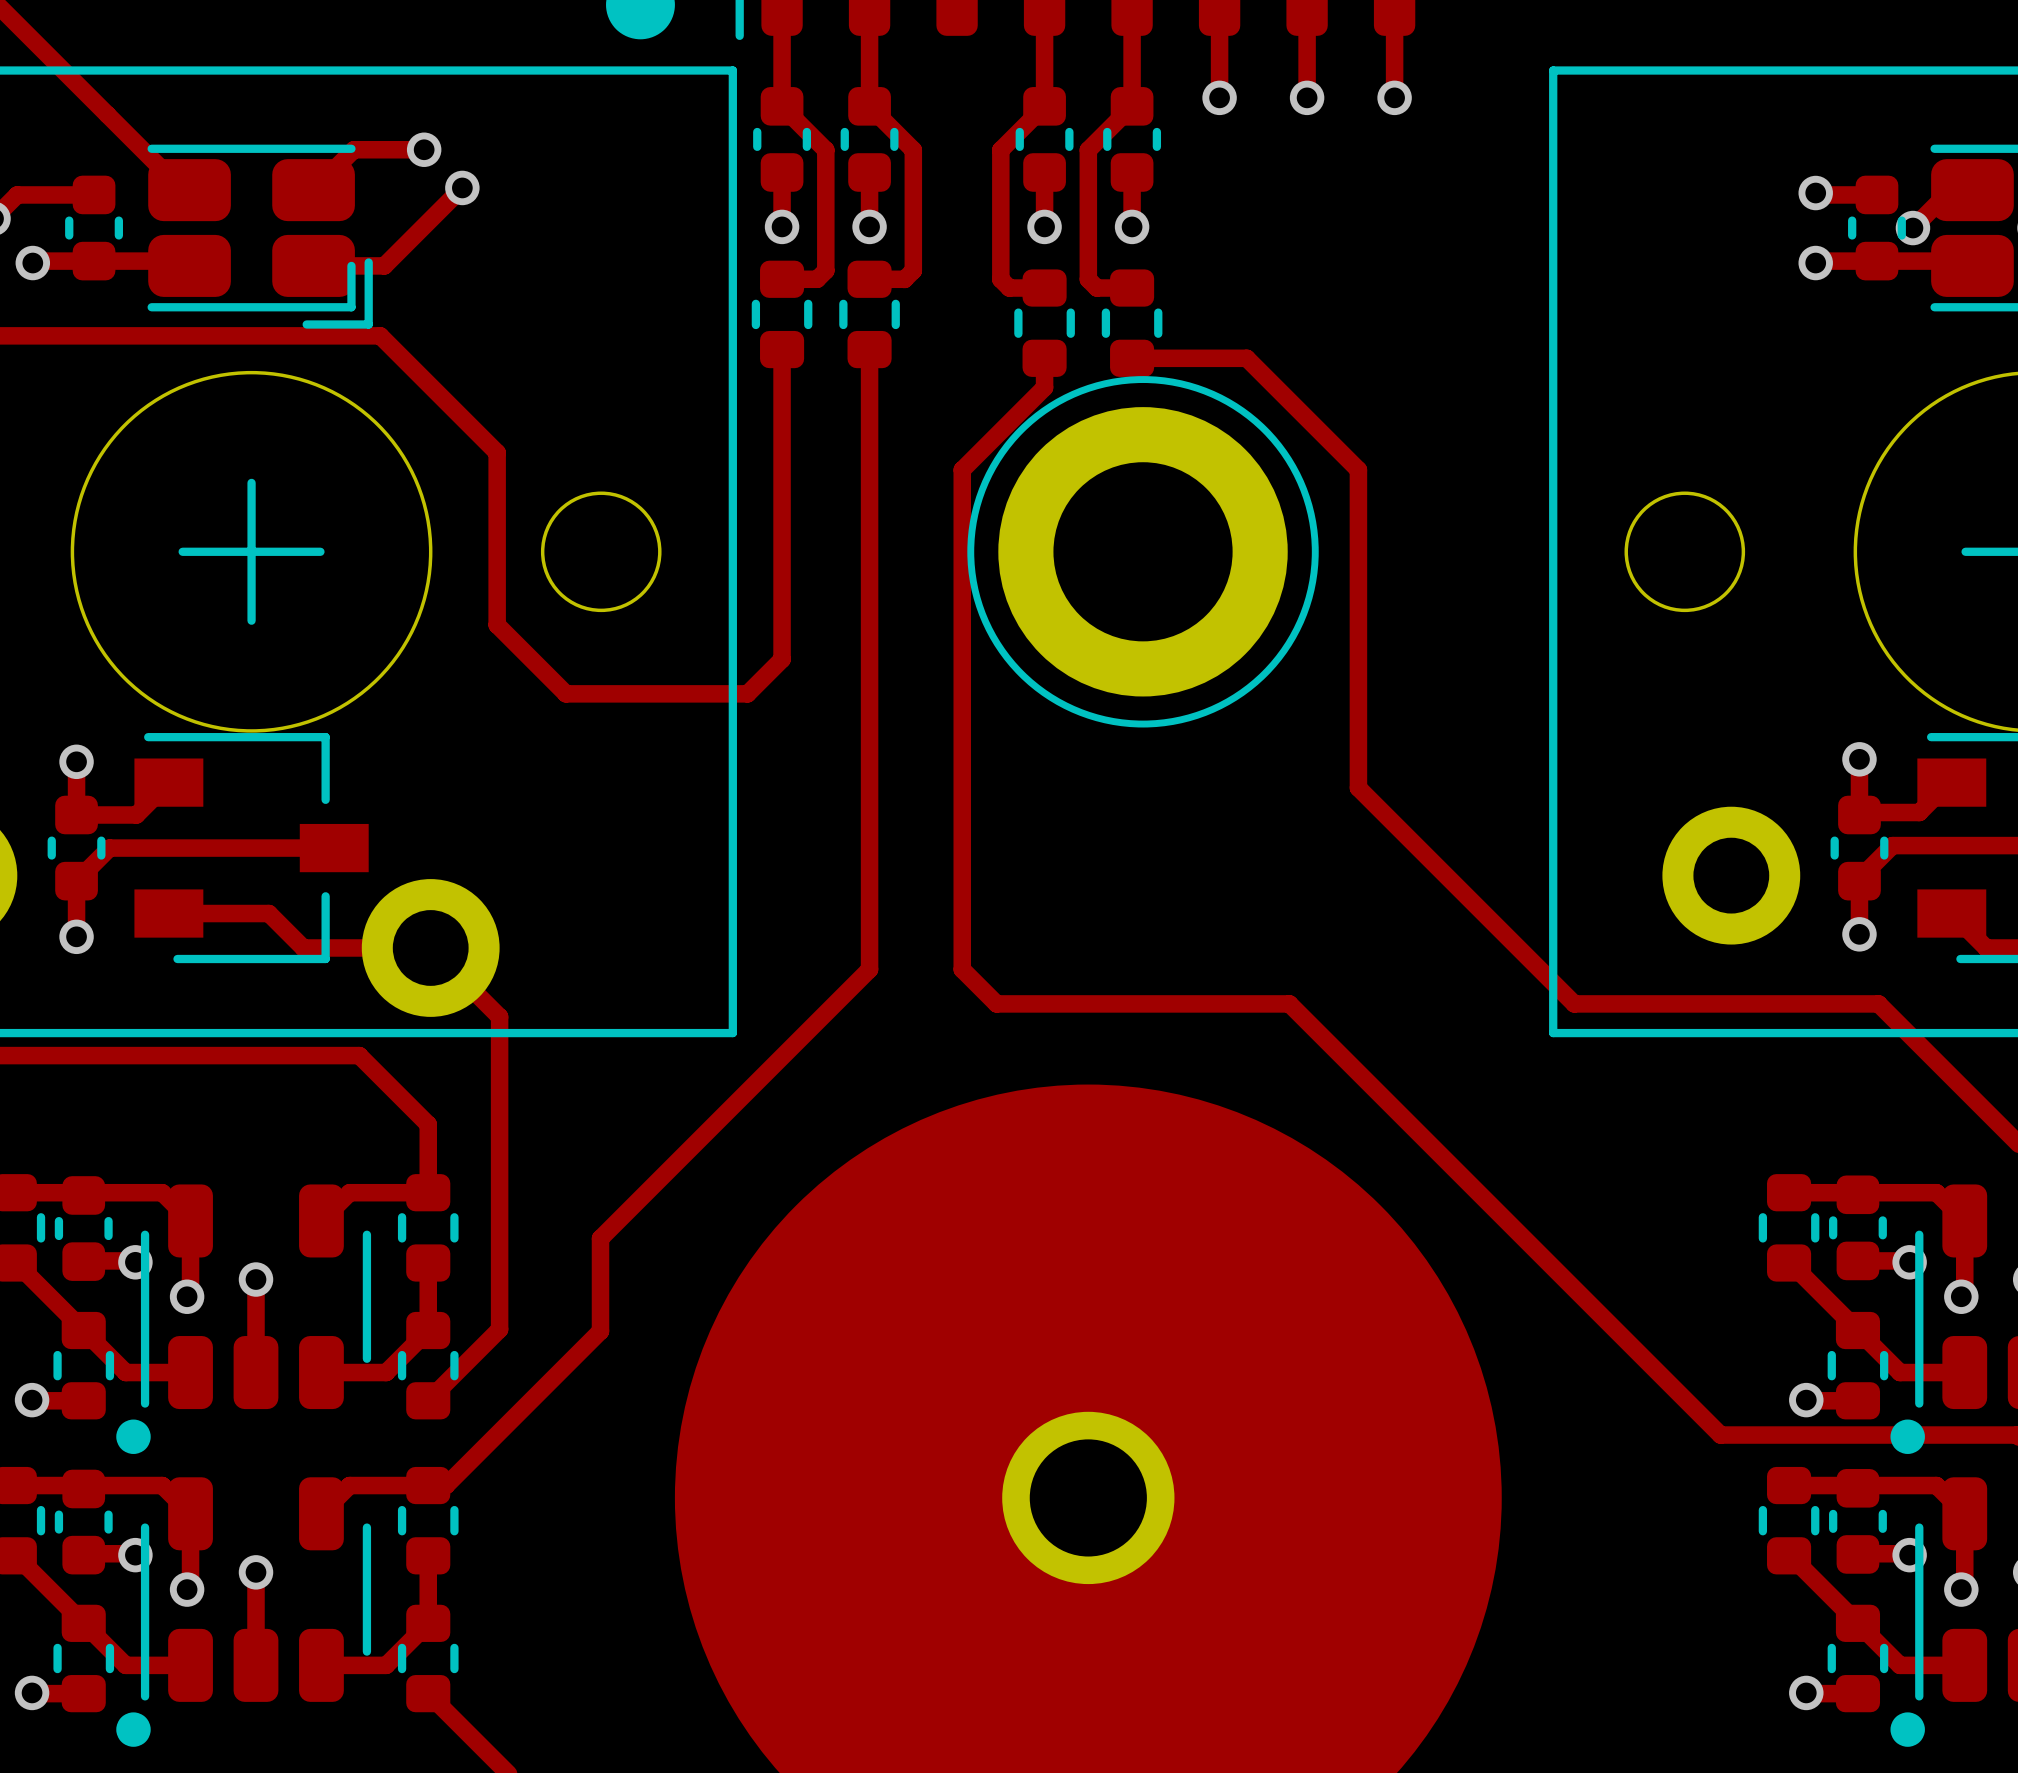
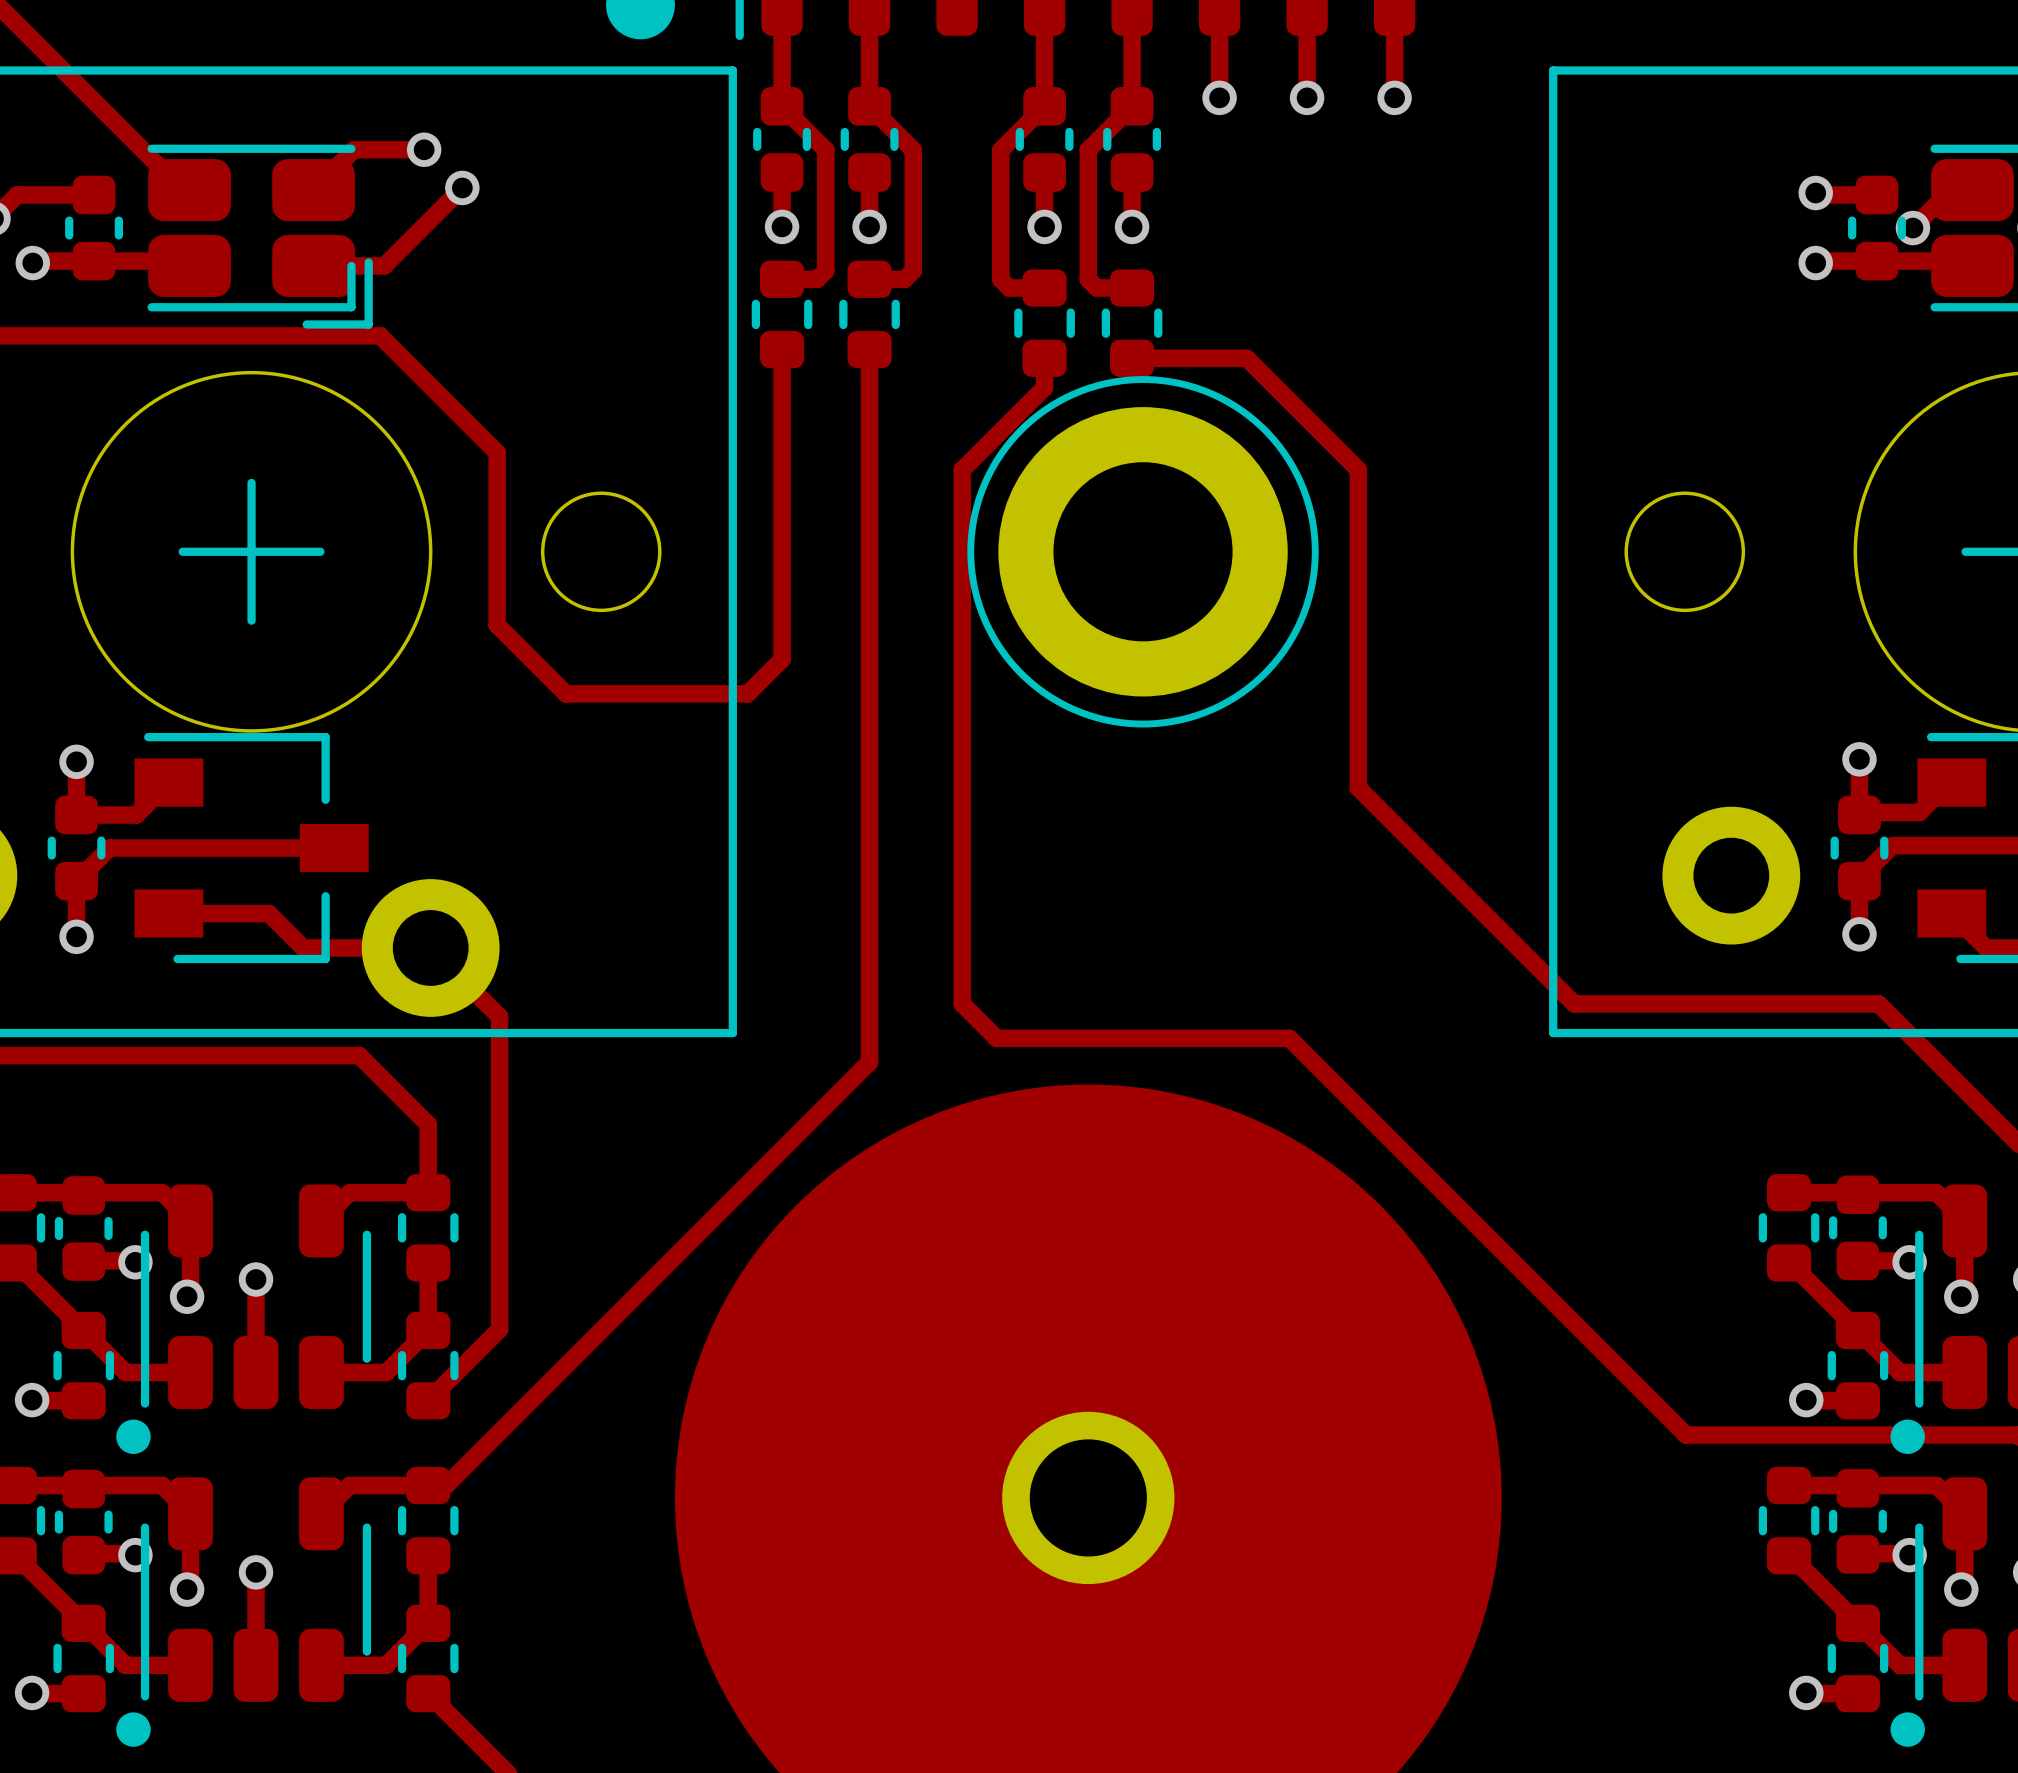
track: (869, 969) (600, 1238) (600, 1331) -> (869, 969) (869, 1062) (600, 1331)
track: (962, 969) (996, 1003) (1289, 1003) (1720, 1435) -> (962, 969) (962, 1003) (996, 1038) (1289, 1038) (1686, 1435) (1720, 1435)

